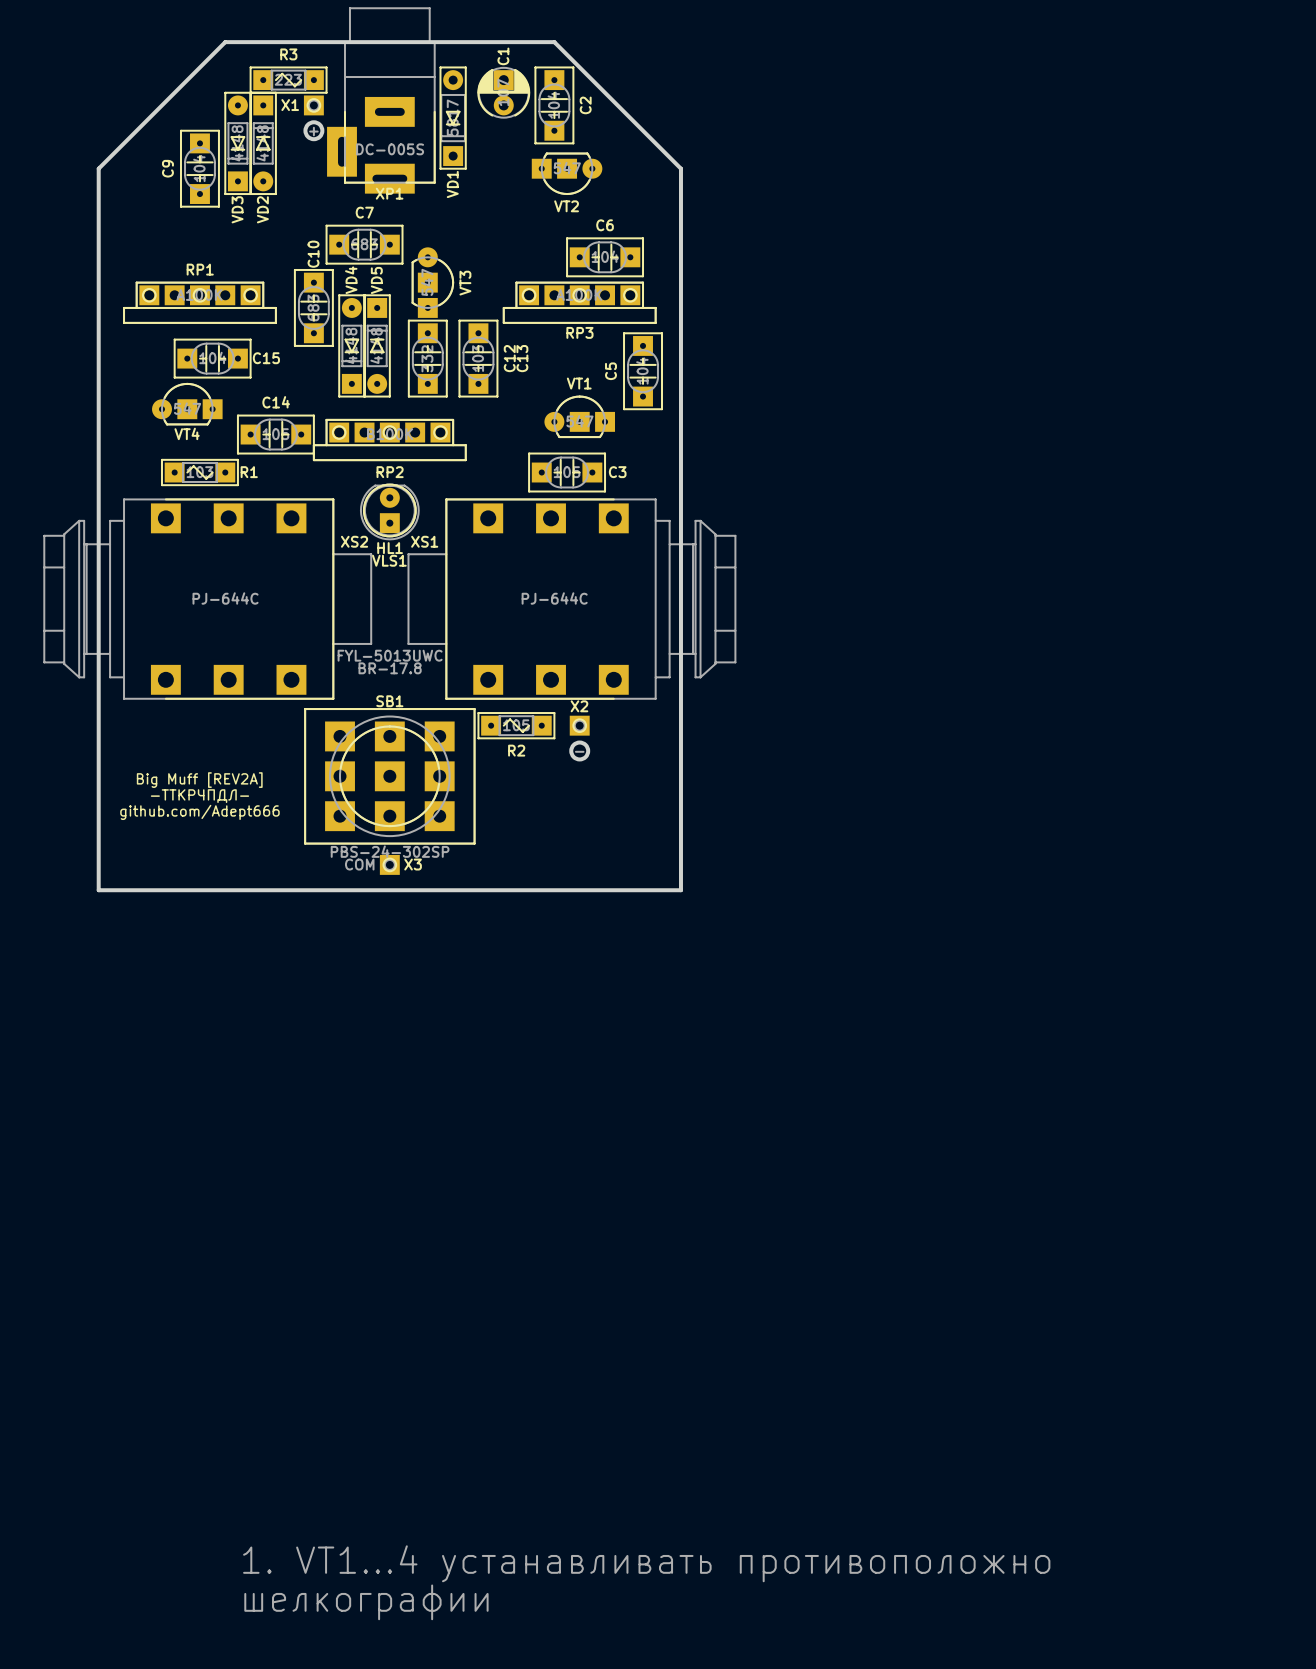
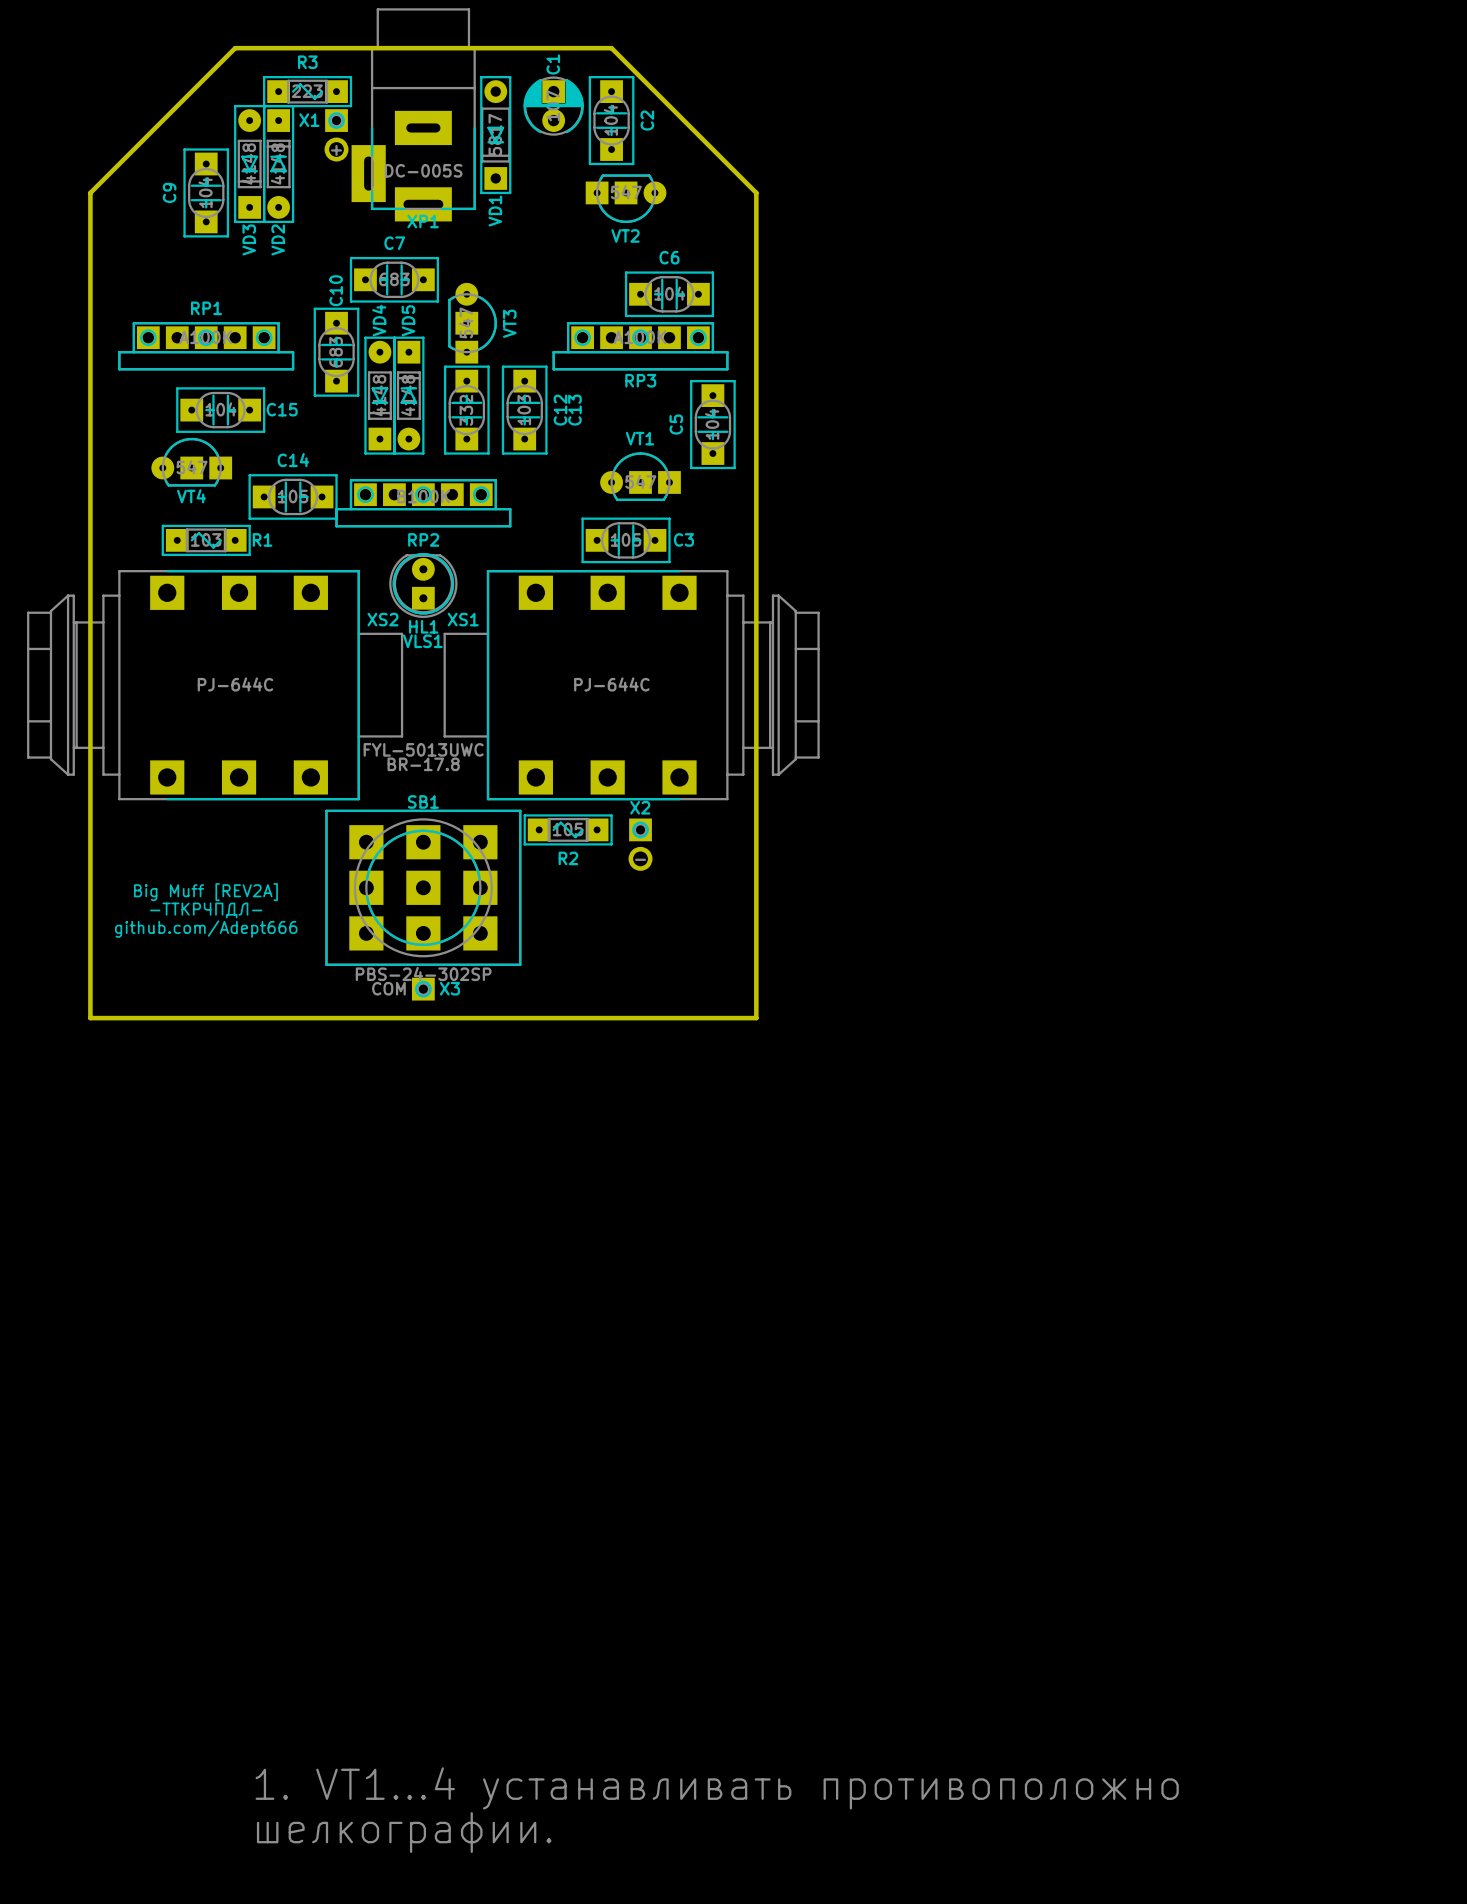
text: шелкографии (366, 1602) -> шелкографии. (404, 1832)

